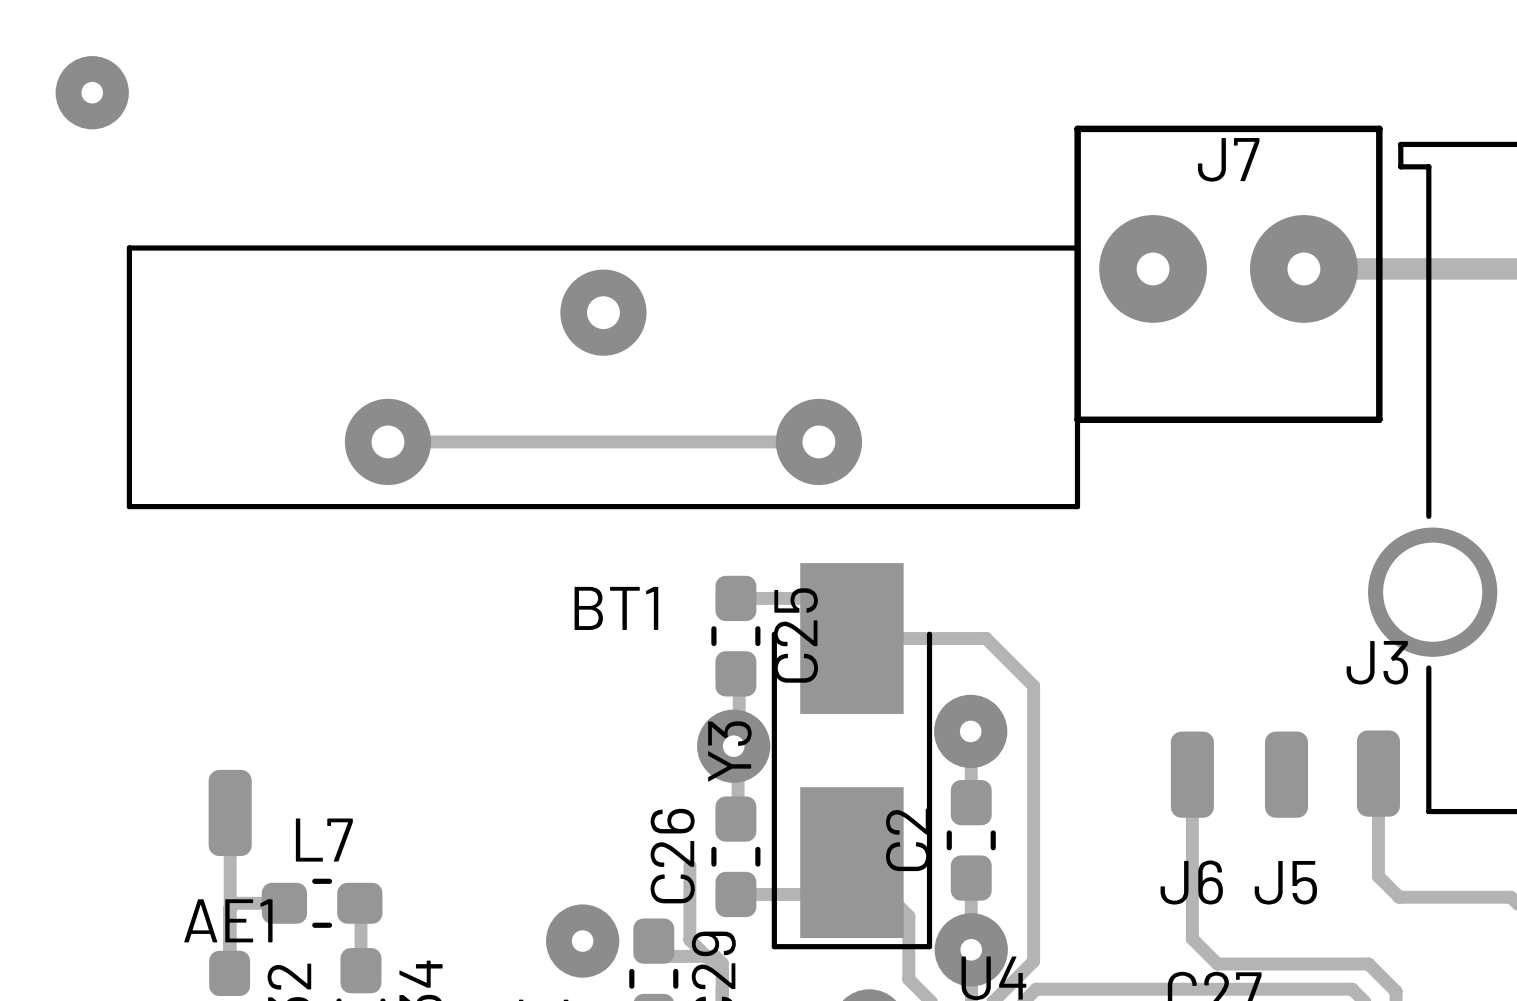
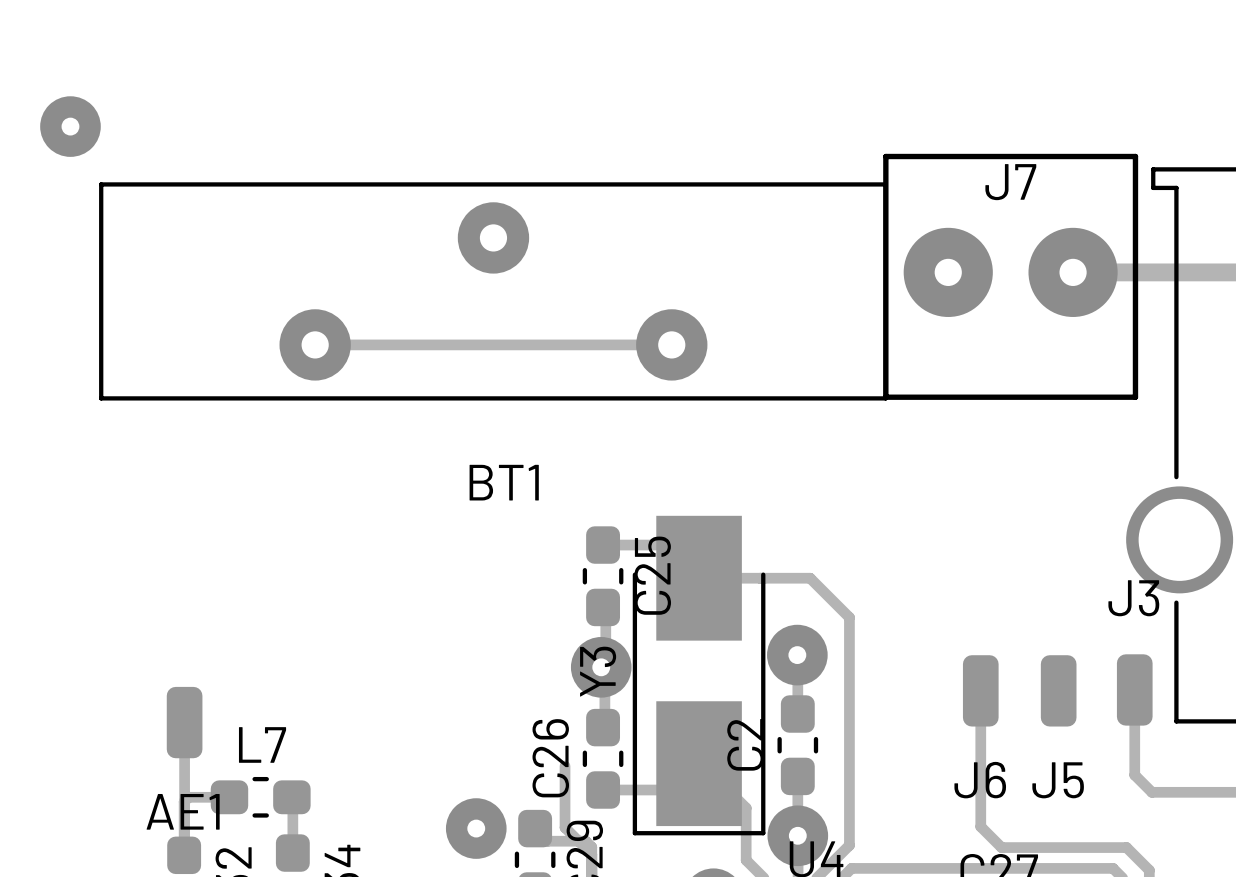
BT1 position: (603, 377) -> (493, 291)
track: (387, 441) (818, 441) -> (315, 344) (671, 344)

